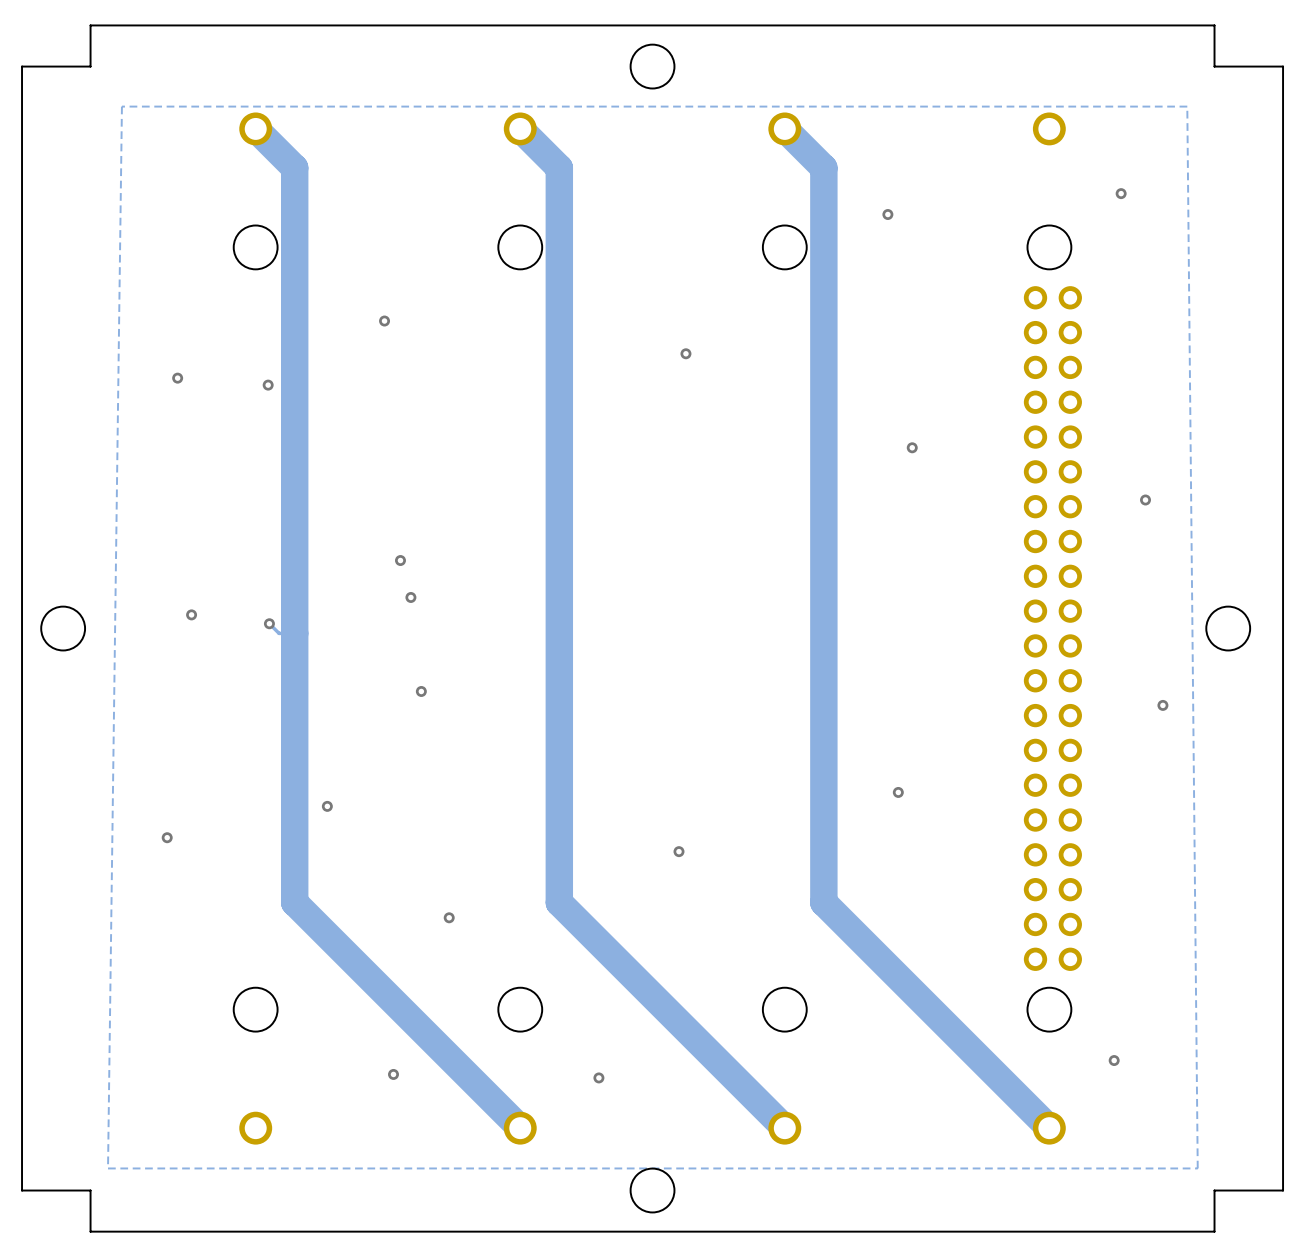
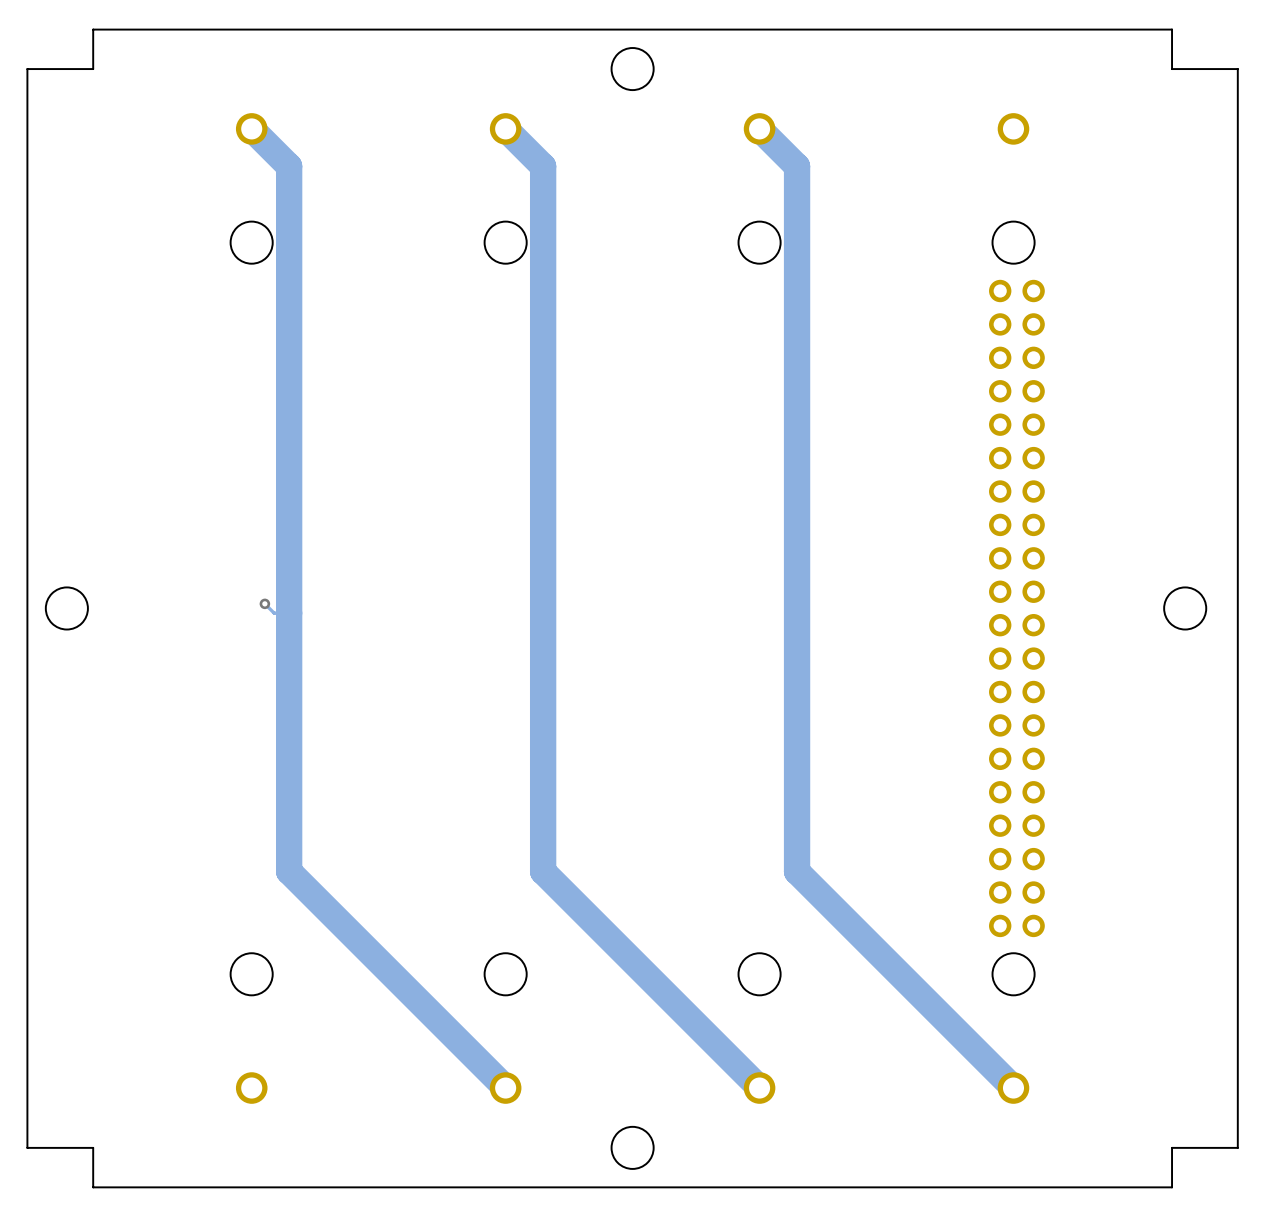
zone outline: (1187, 106) (1197, 1168) (108, 1168) (121, 106) (1187, 106) -> none
via: (1121, 193) -> none
via: (887, 214) -> none
via: (384, 321) -> none
via: (685, 353) -> none
via: (177, 378) -> none
via: (268, 385) -> none
via: (912, 447) -> none
via: (1145, 500) -> none
via: (400, 560) -> none
via: (410, 597) -> none
via: (191, 614) -> none
via: (421, 691) -> none
via: (1162, 705) -> none
via: (898, 792) -> none
via: (327, 806) -> none
via: (167, 837) -> none
via: (678, 851) -> none
via: (449, 917) -> none
via: (1114, 1060) -> none
via: (393, 1074) -> none
via: (598, 1077) -> none

